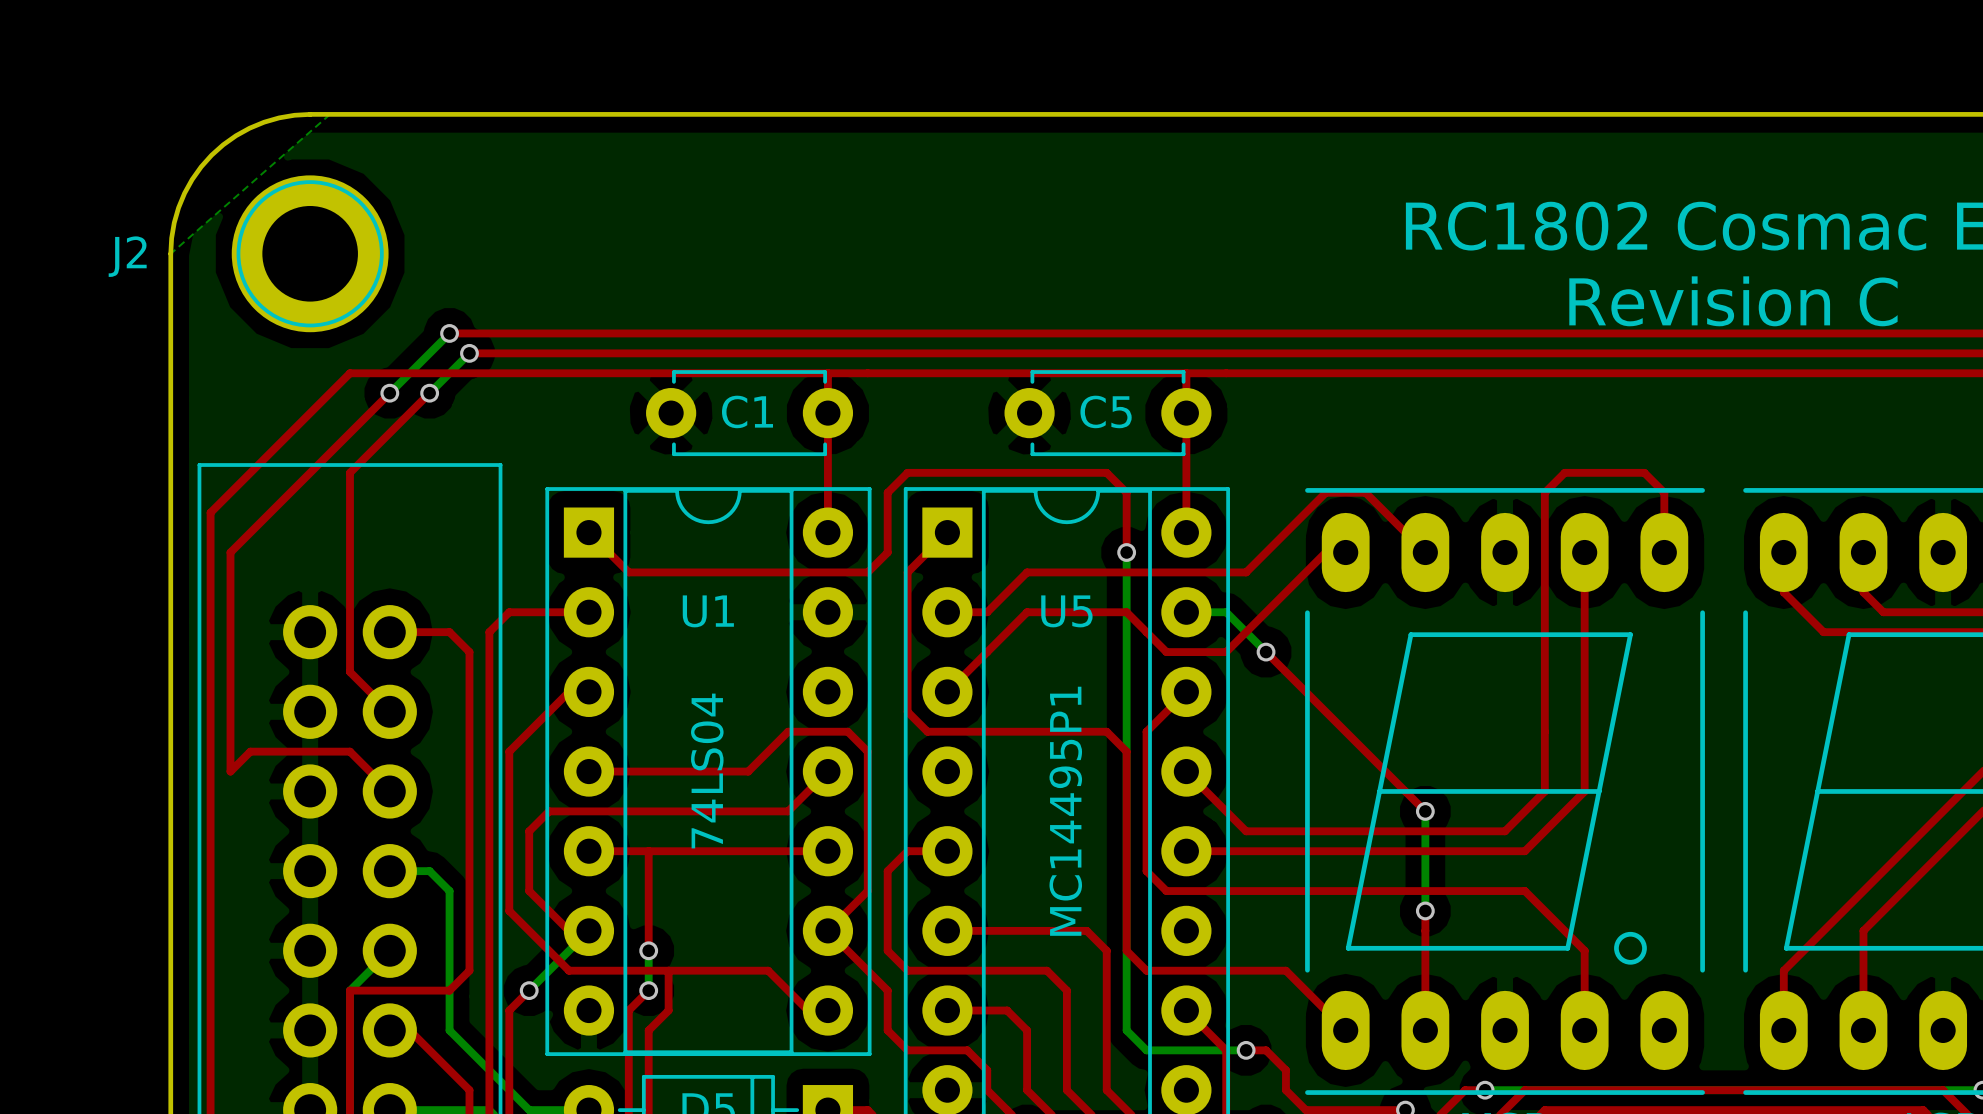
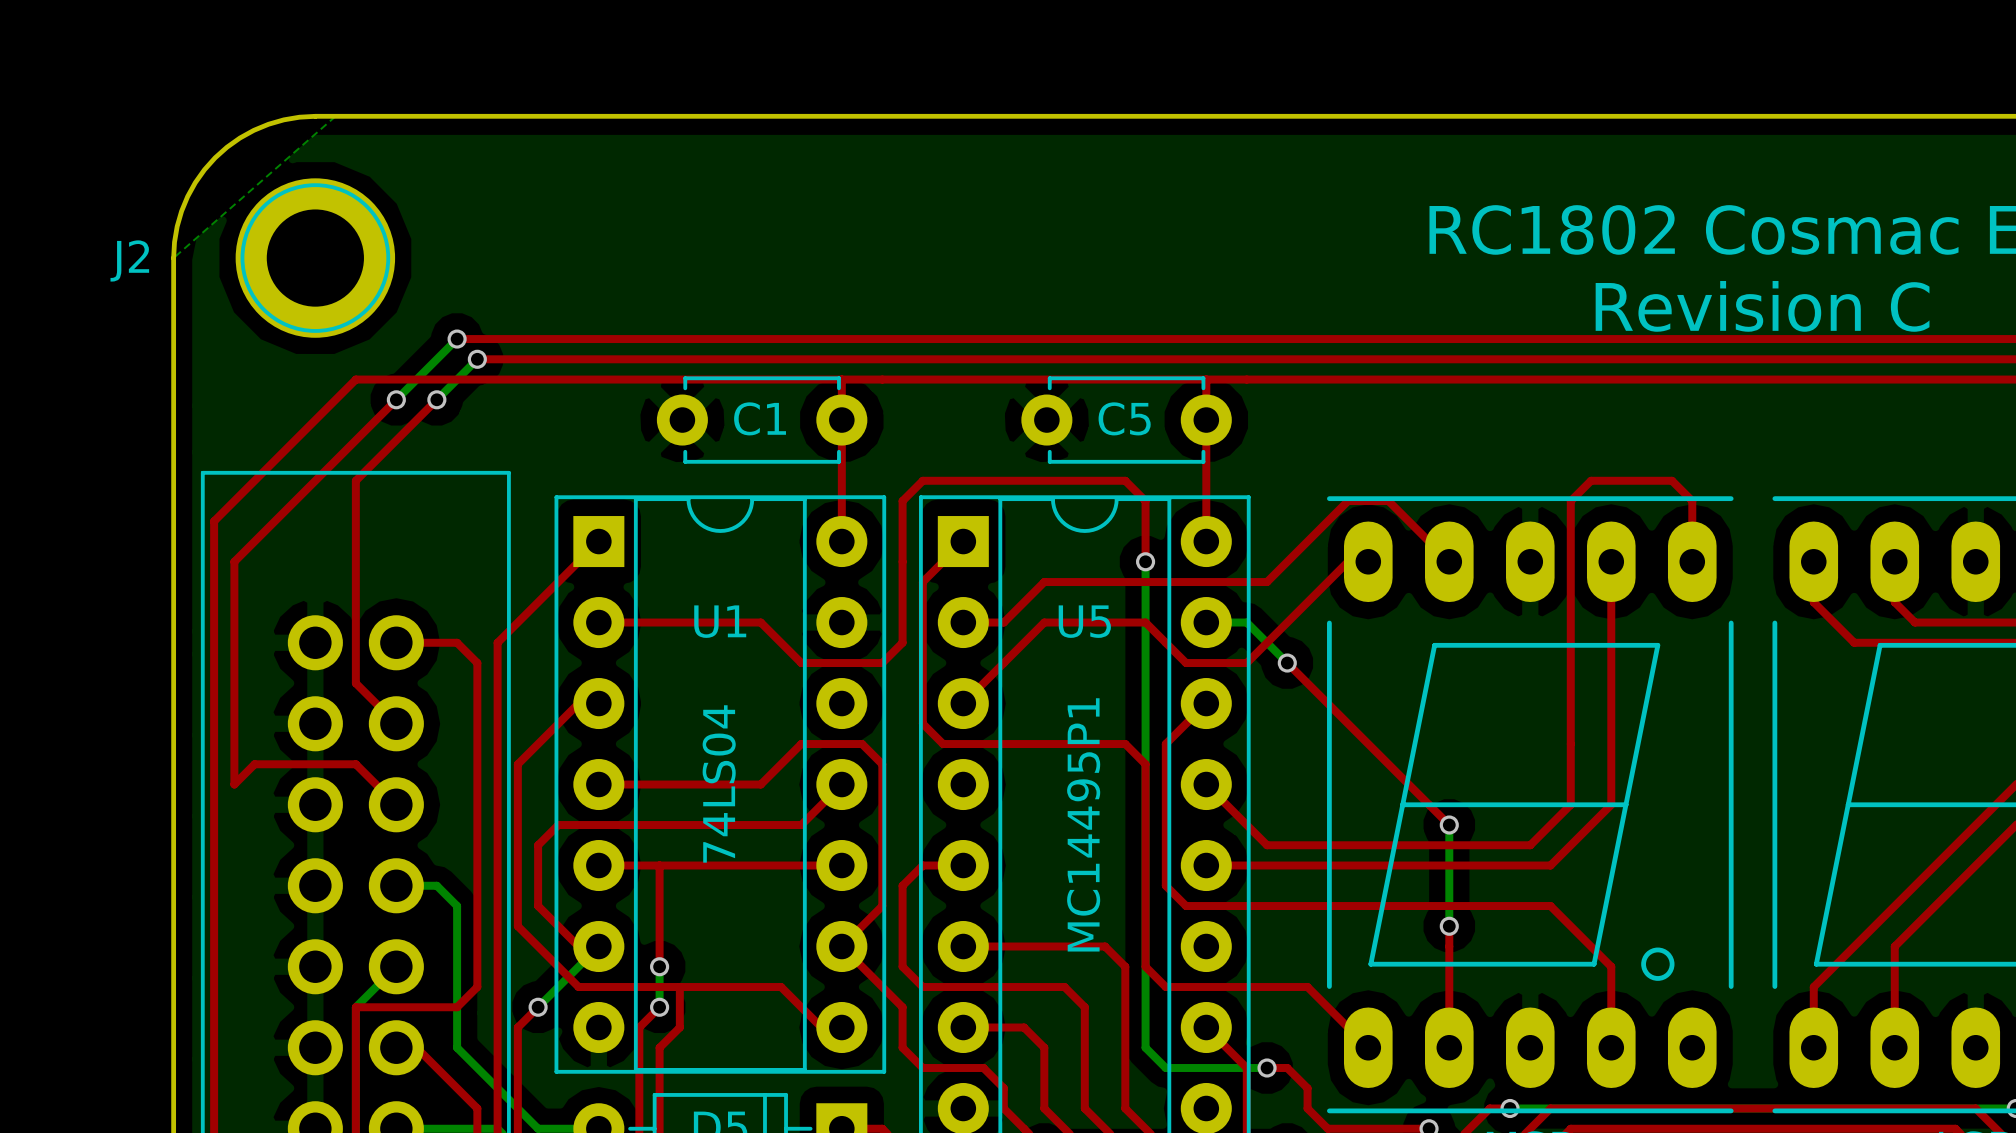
top track: (588, 532) (628, 572) (867, 572) (887, 552) -> (598, 622) (760, 622) (801, 663) (882, 663) (902, 642) (902, 561)
top track: (509, 612) (588, 612) -> (517, 622) (598, 541)

